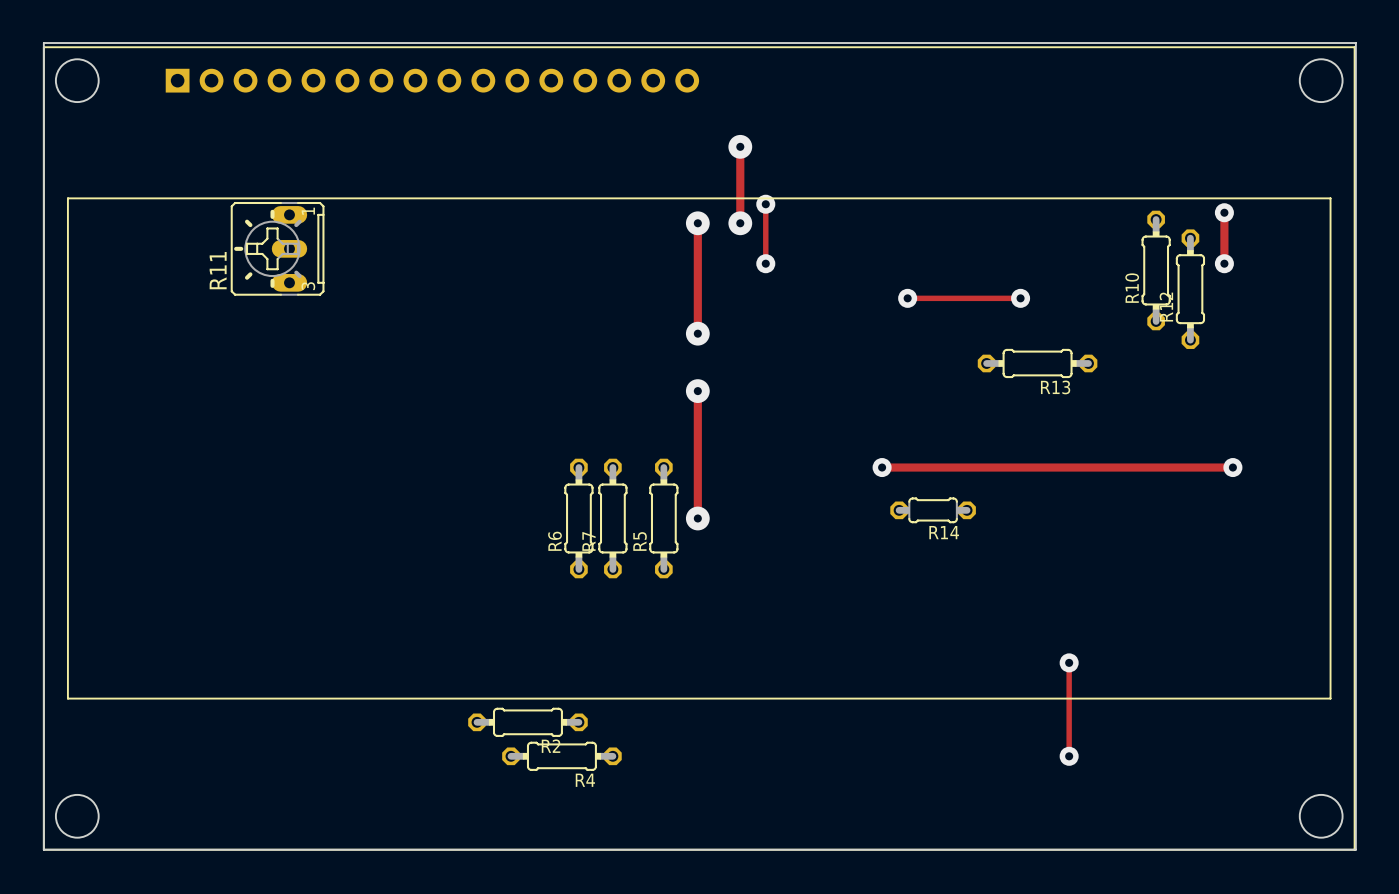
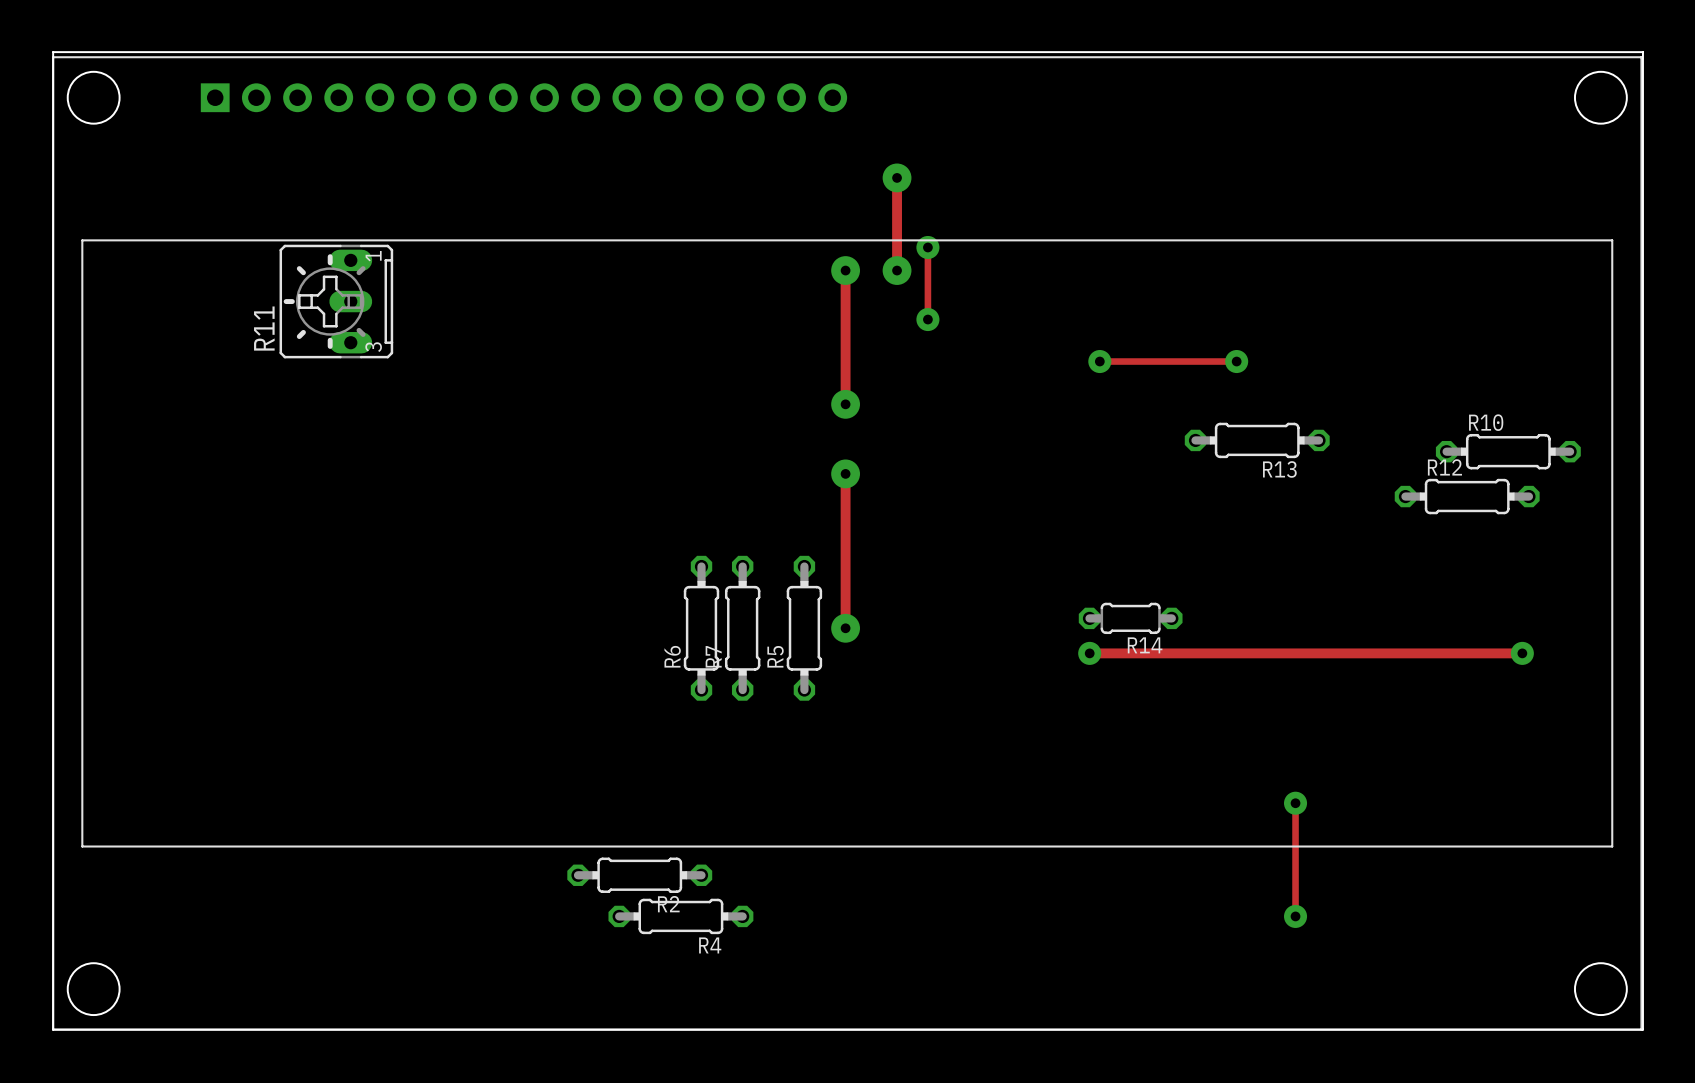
track: (1224, 212) (1224, 263) -> none
via: (1224, 212) -> none
via: (1224, 263) -> none
R10 rotation: 0° (1156, 270) -> 90° clockwise (1508, 451)
R10 position: (1156, 270) -> (1508, 451)
R12 rotation: 0° (1190, 289) -> 90° clockwise (1467, 496)
R12 position: (1190, 289) -> (1467, 496)
track: (882, 467) (1232, 467) -> none
via position: (882, 467) -> (1089, 653)
via position: (1232, 467) -> (1522, 653)
track: none -> (1089, 653) (1522, 653)

